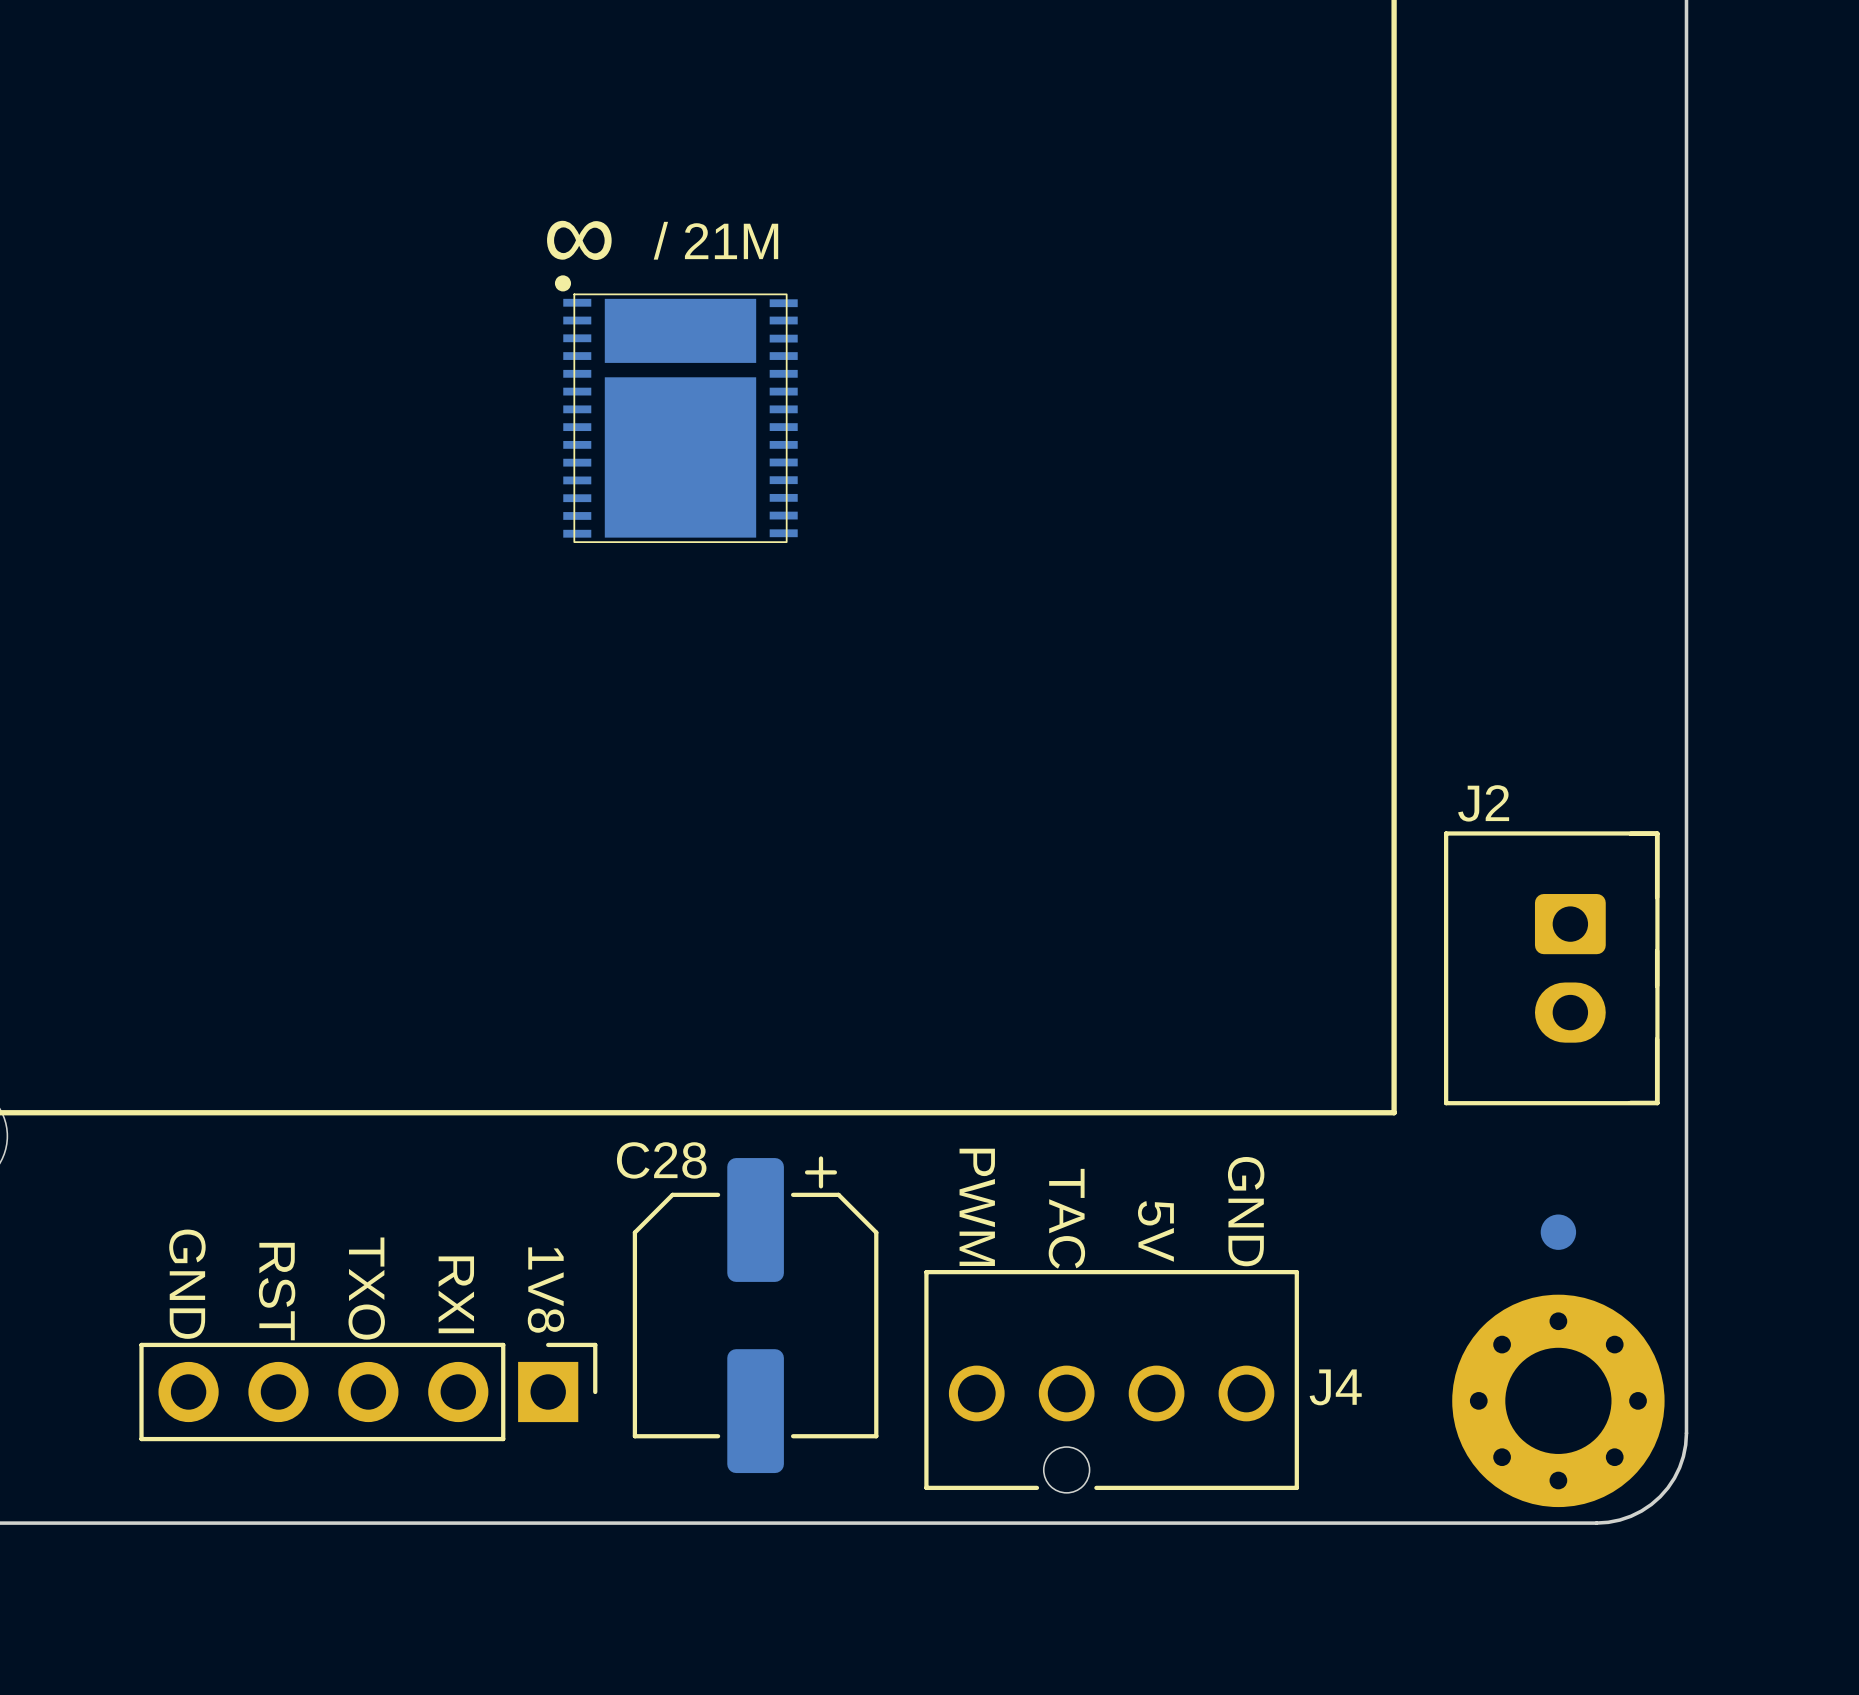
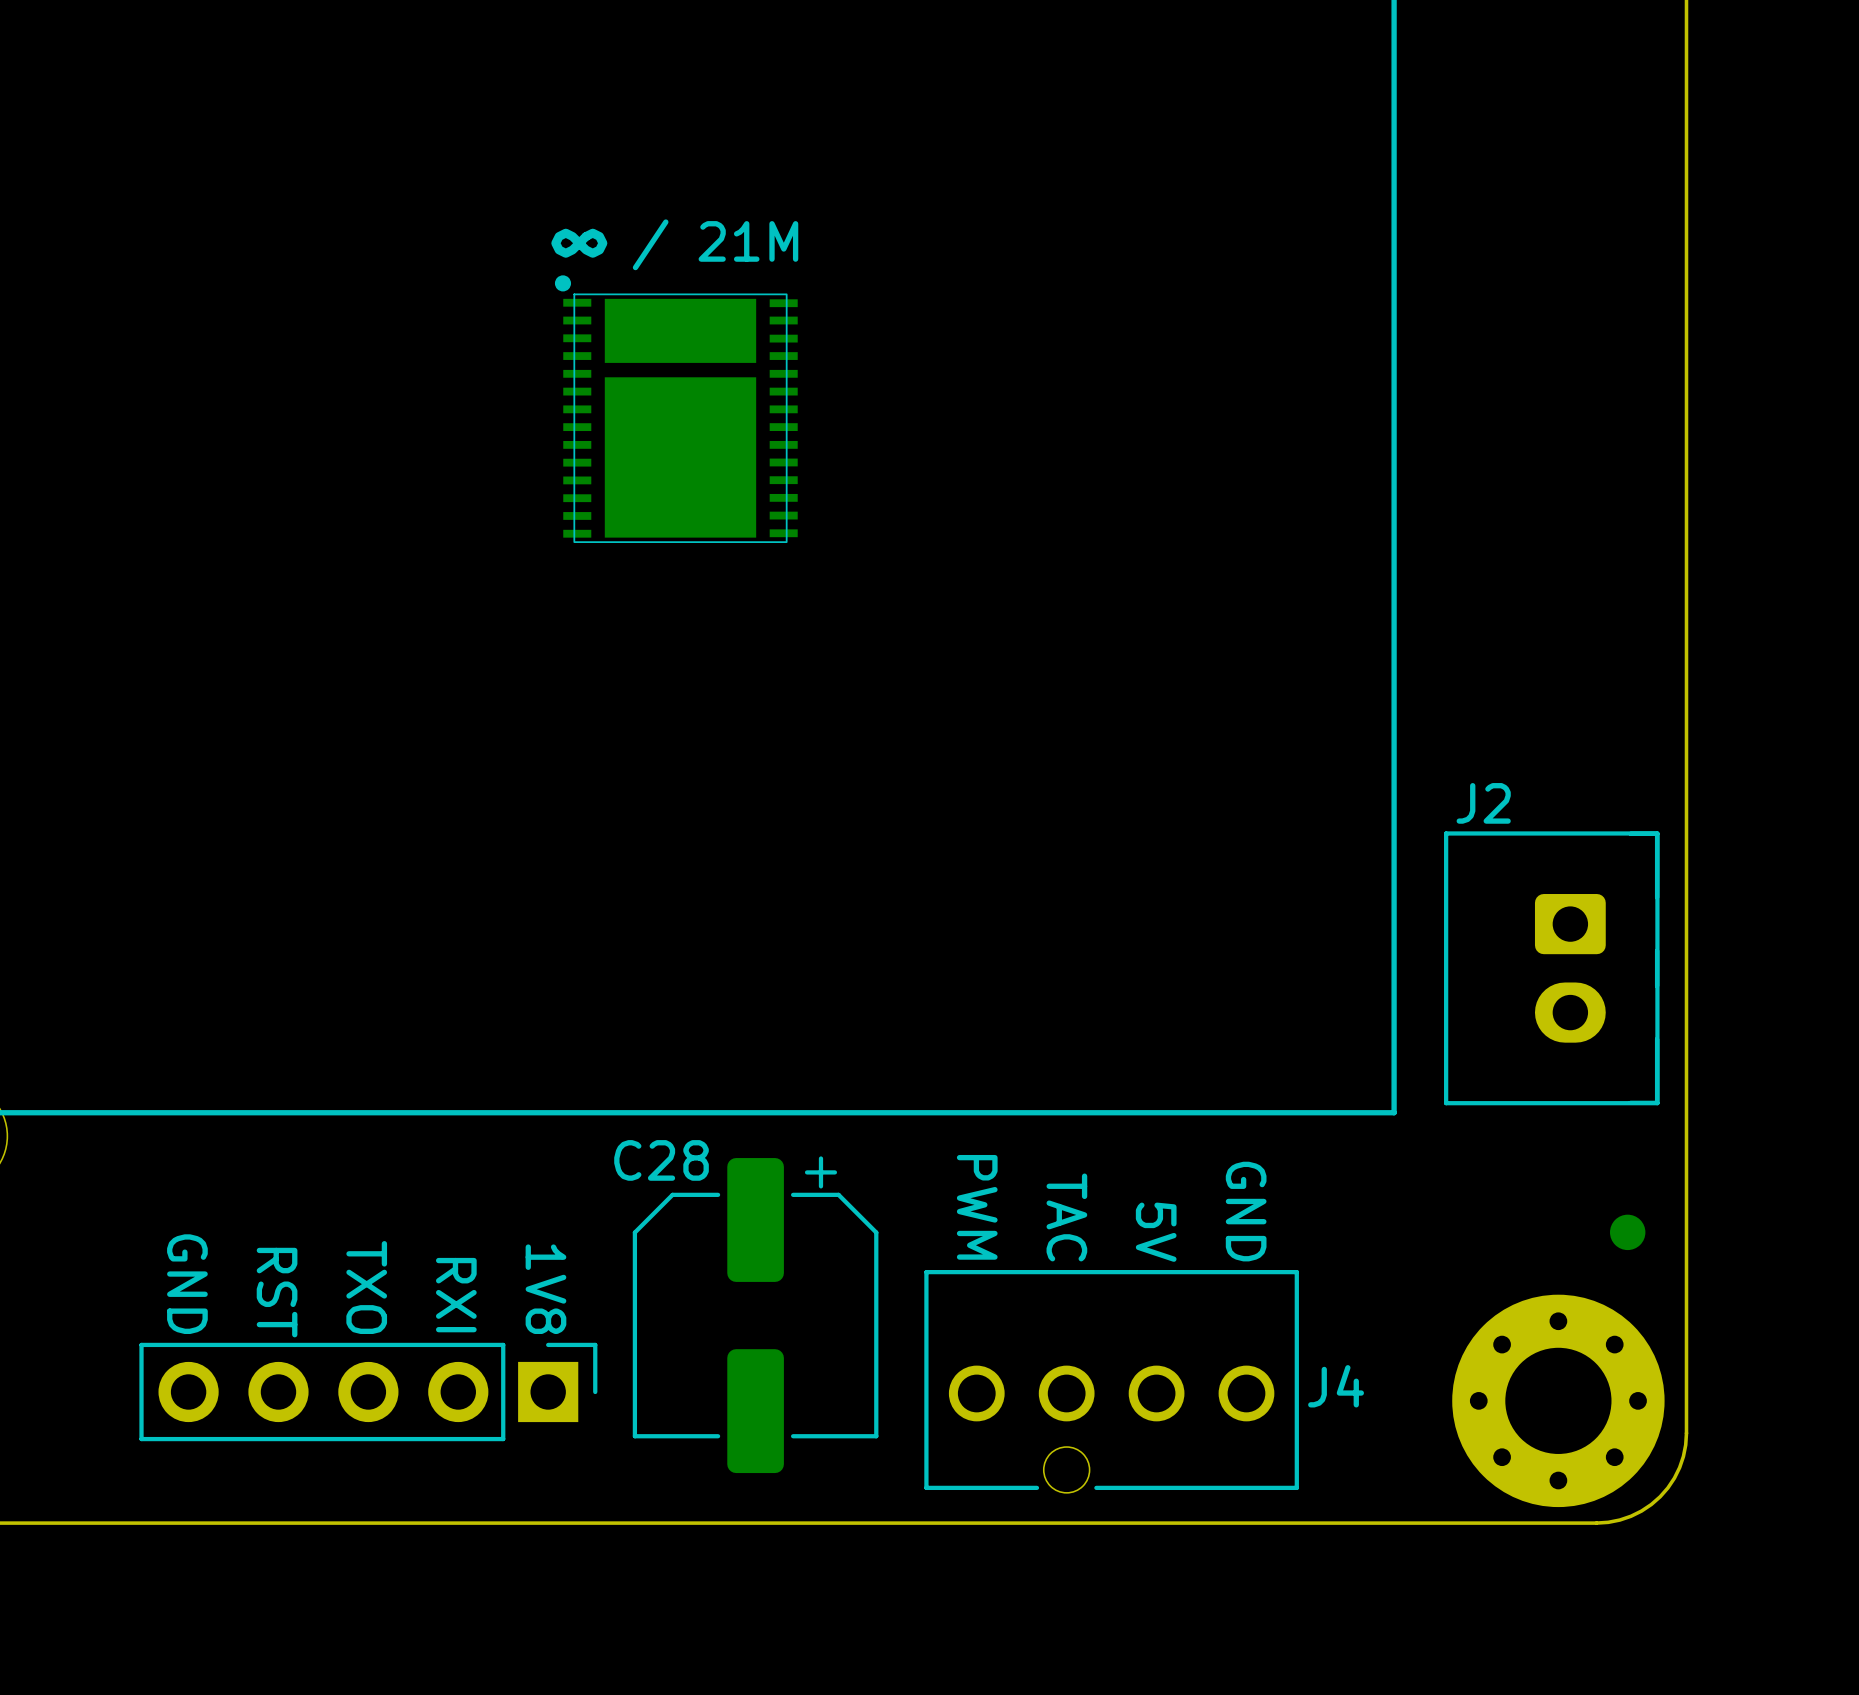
part position: (1558, 1232) -> (1627, 1232)

